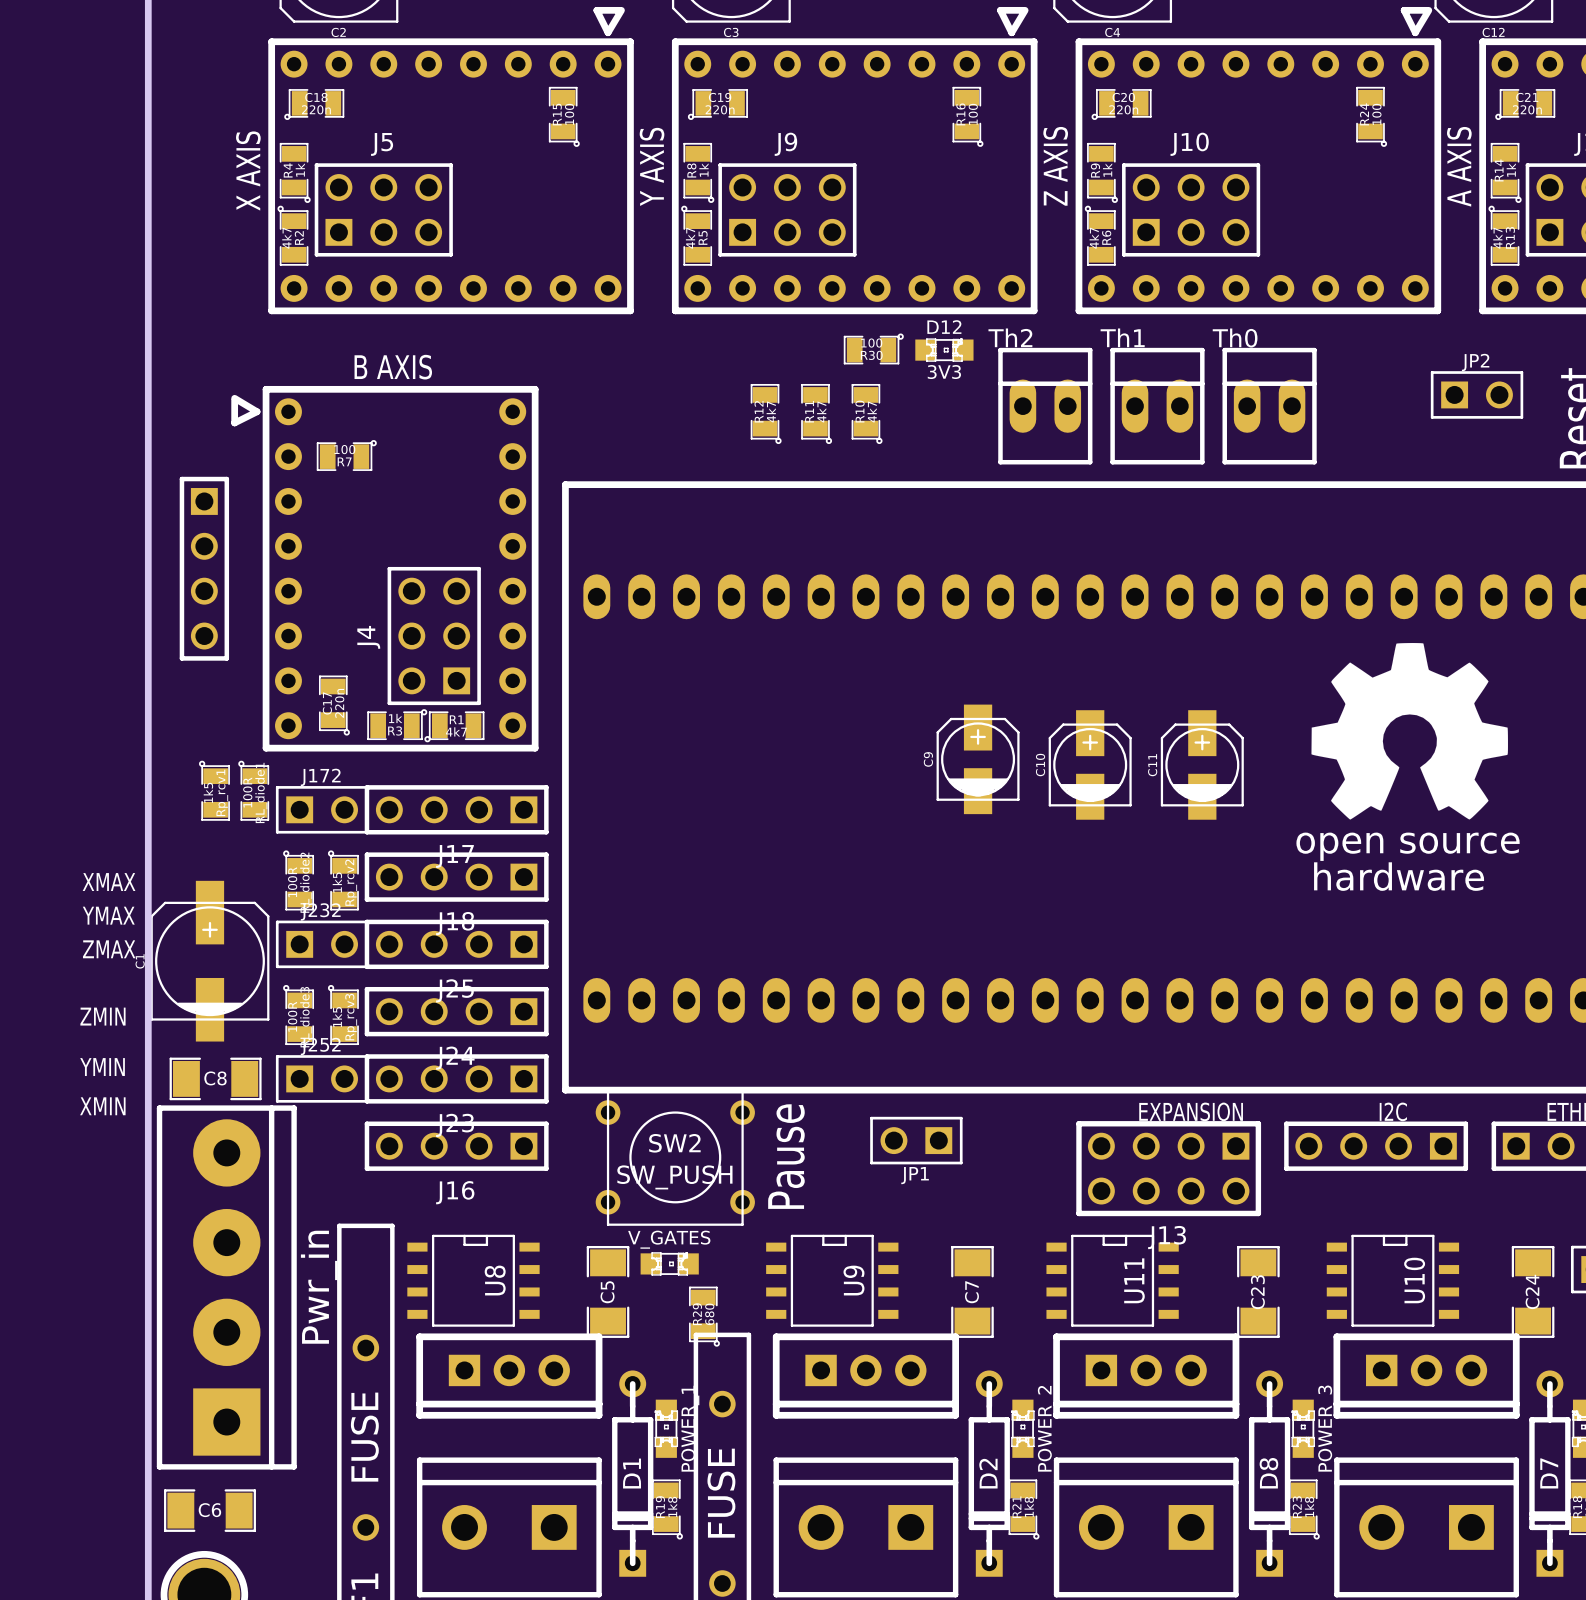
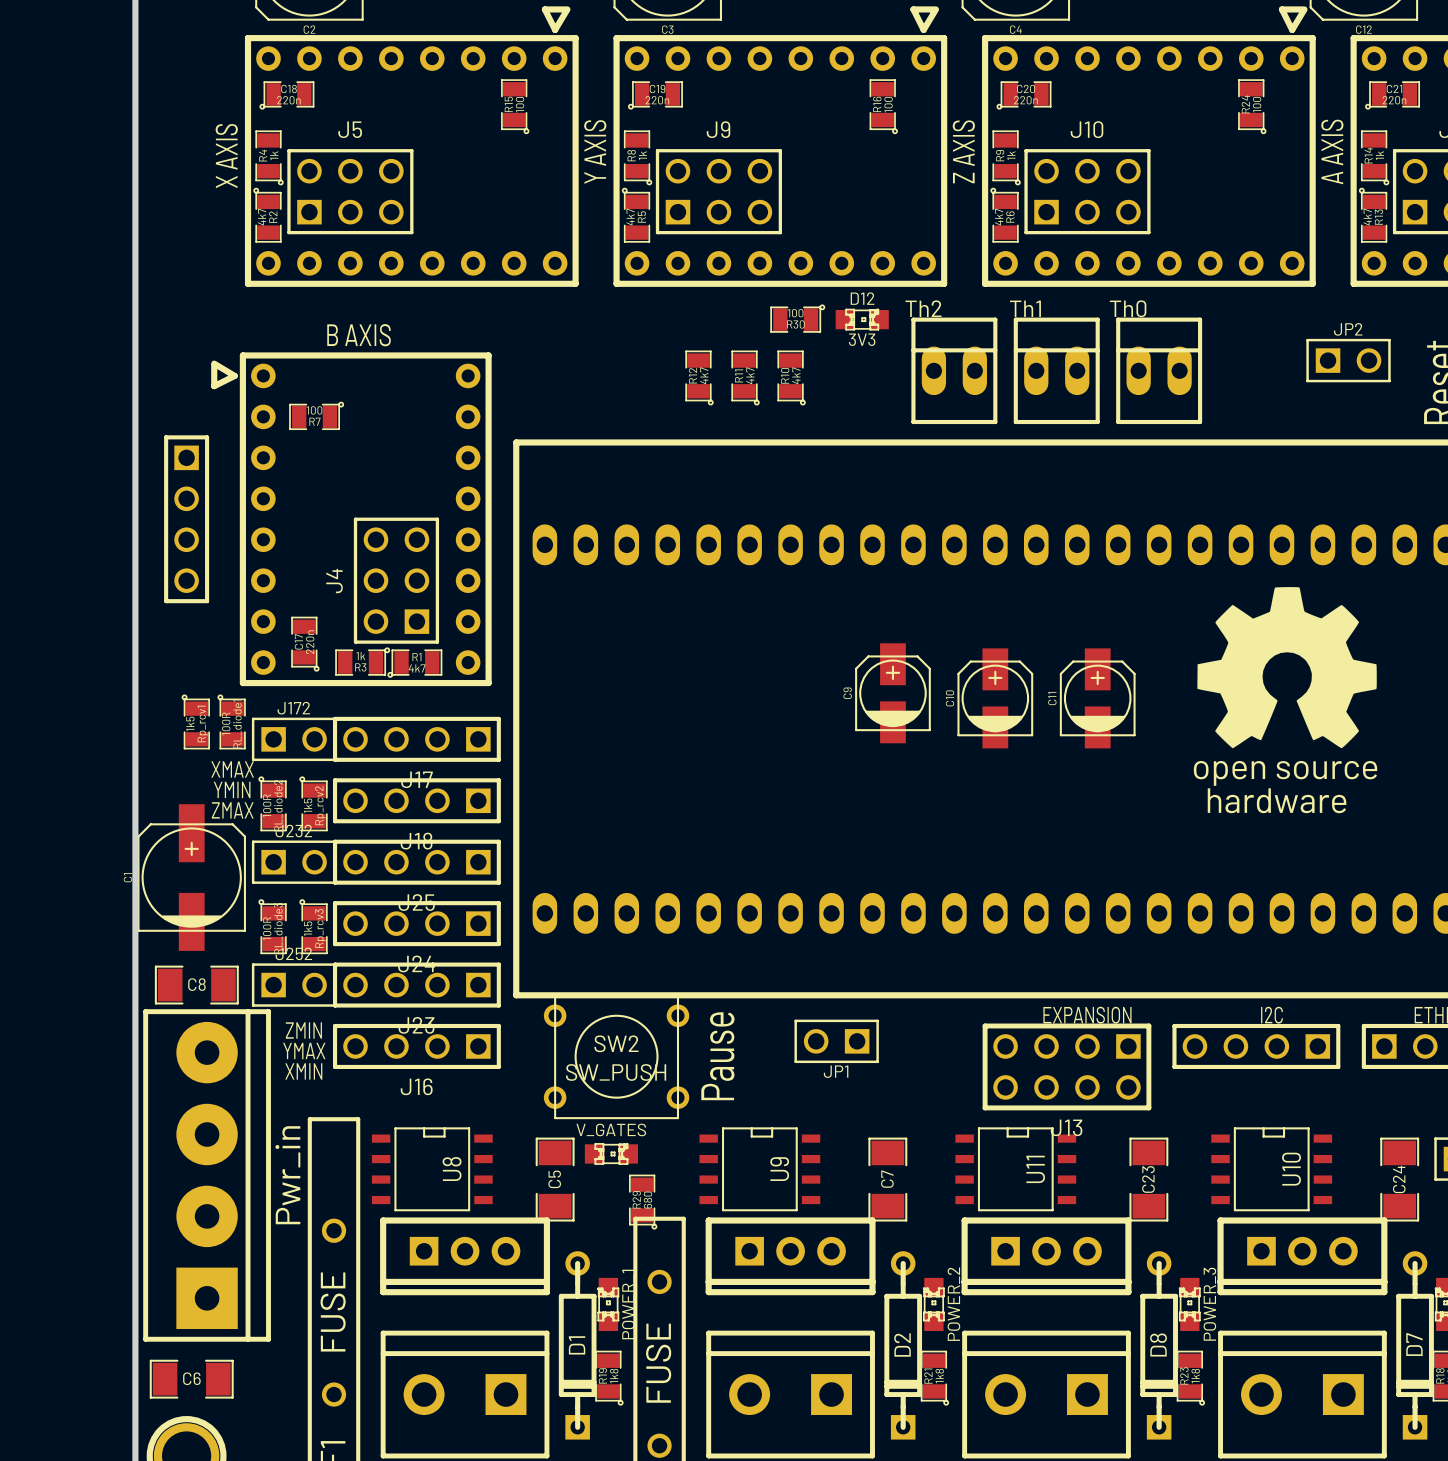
text position: XMAX (109, 882) -> XMAX (232, 769)
text position: YMAX (108, 915) -> YMAX (304, 1050)
text position: ZMAX (109, 949) -> ZMAX (232, 810)
text position: ZMIN (102, 1016) -> ZMIN (303, 1030)
text position: YMIN (102, 1067) -> YMIN (232, 789)
text position: XMIN (102, 1106) -> XMIN (303, 1071)

